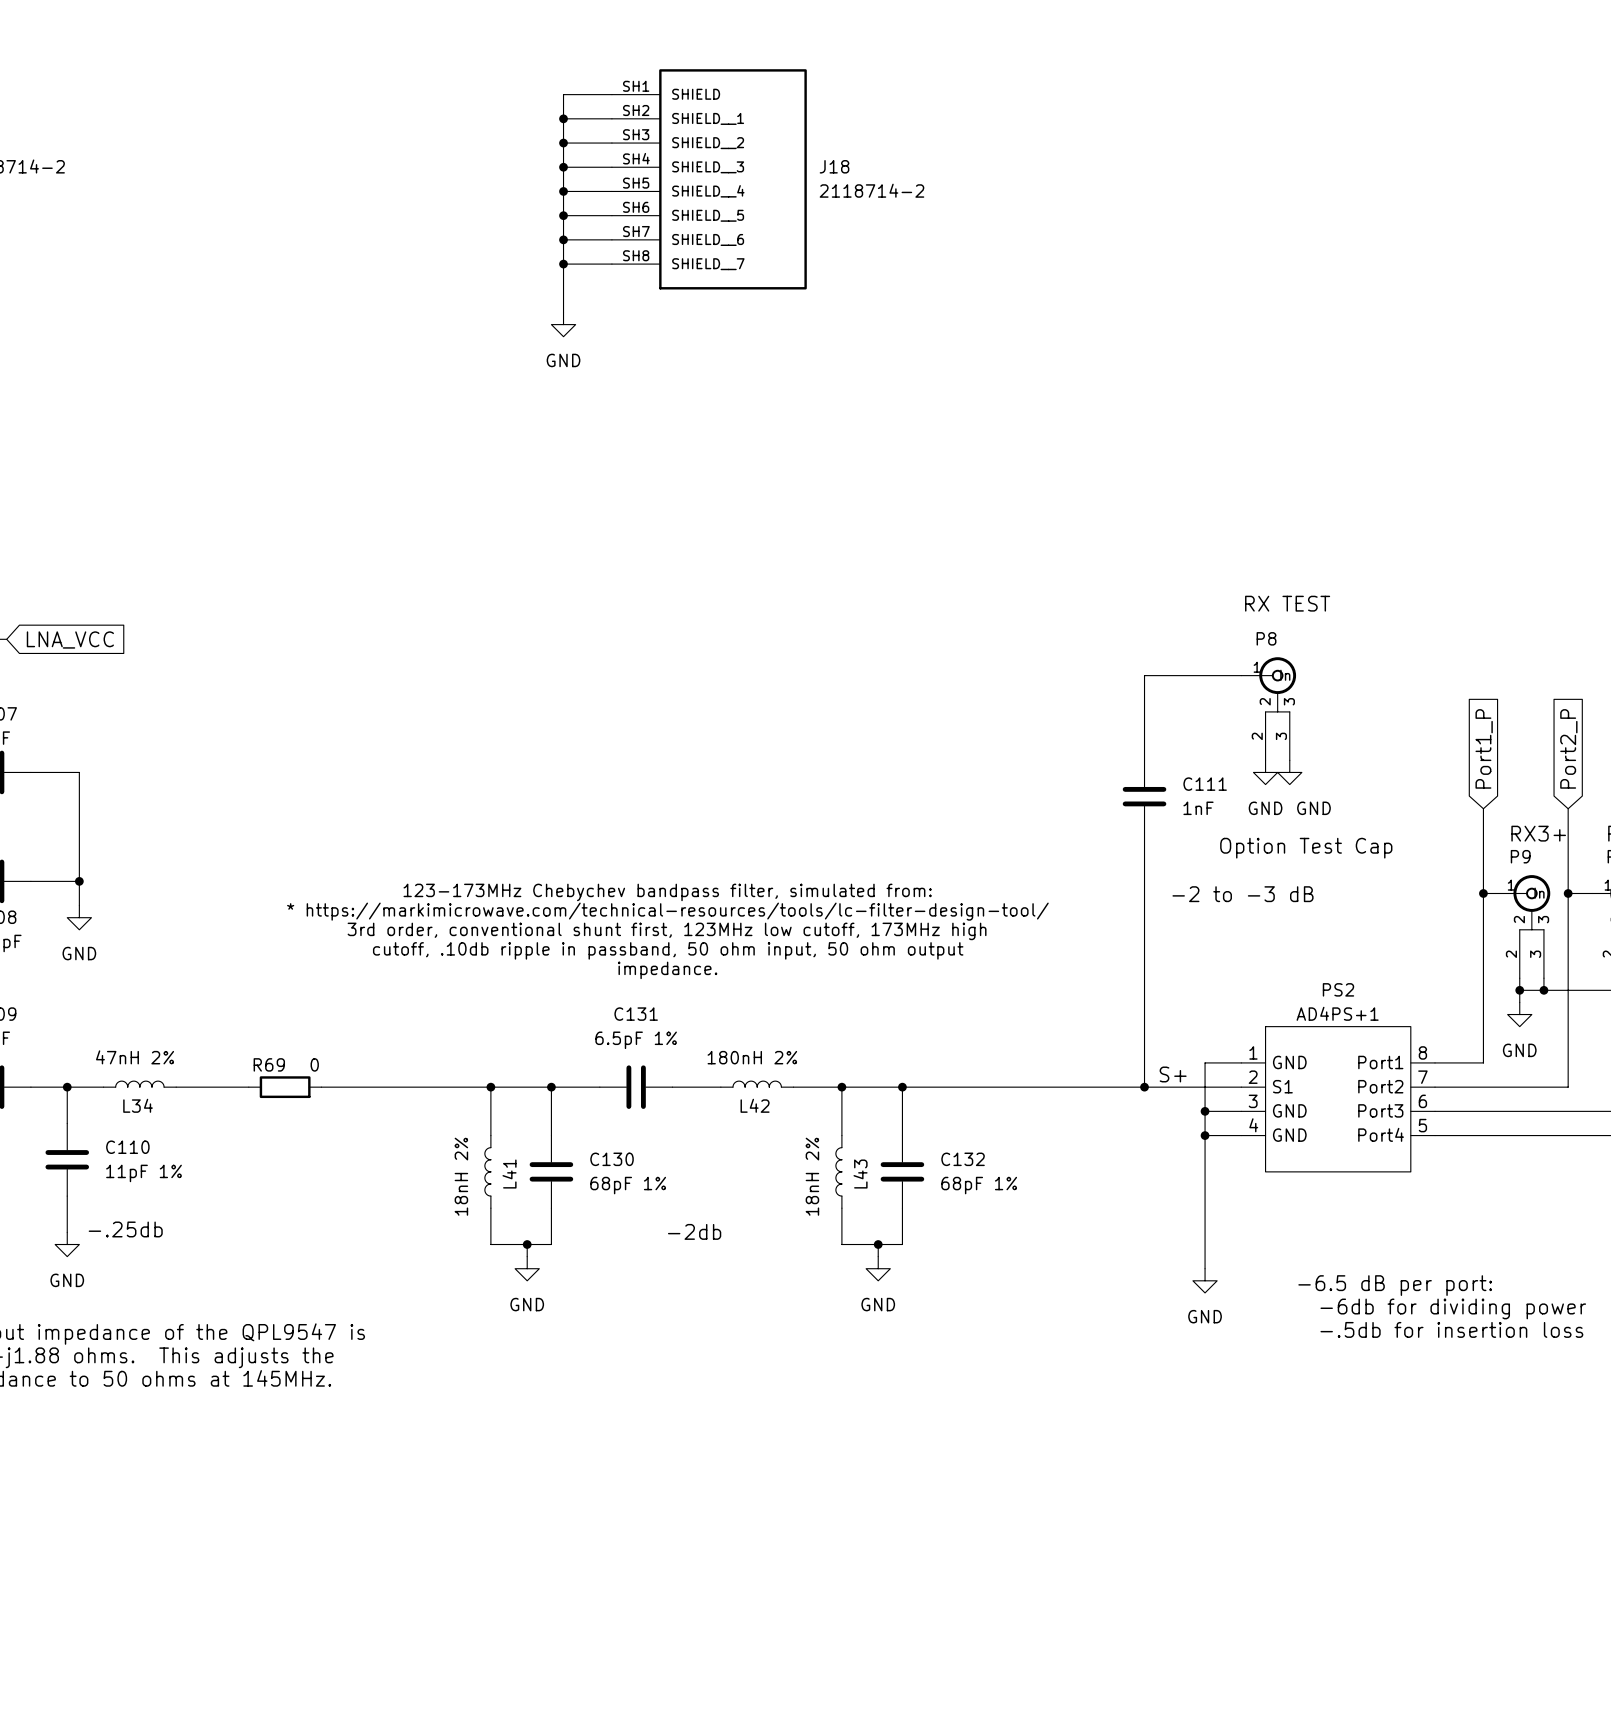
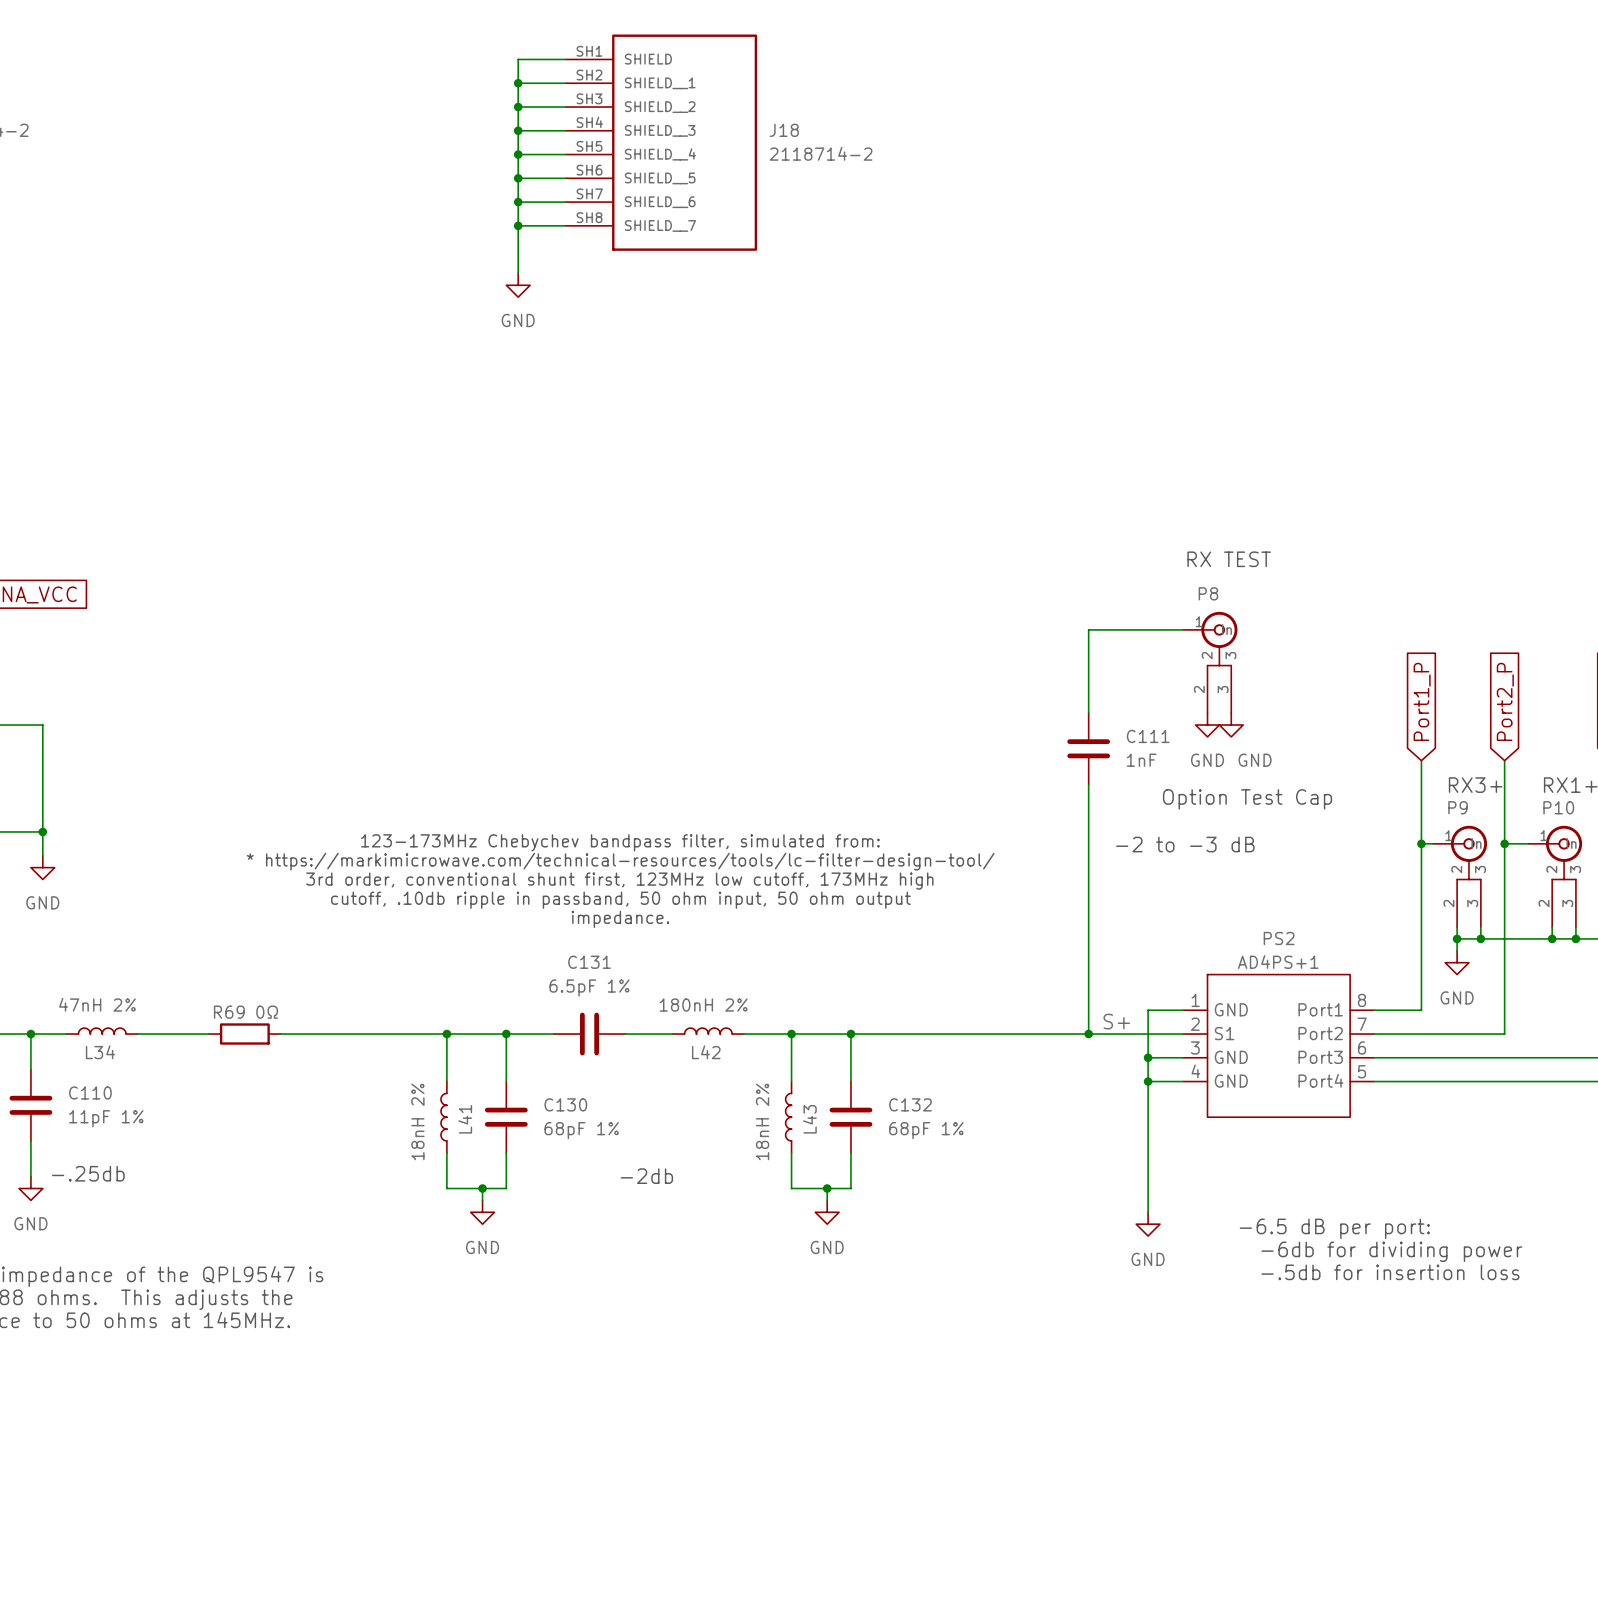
R69 value: 0 (314, 1064) -> 0Ω (267, 1012)

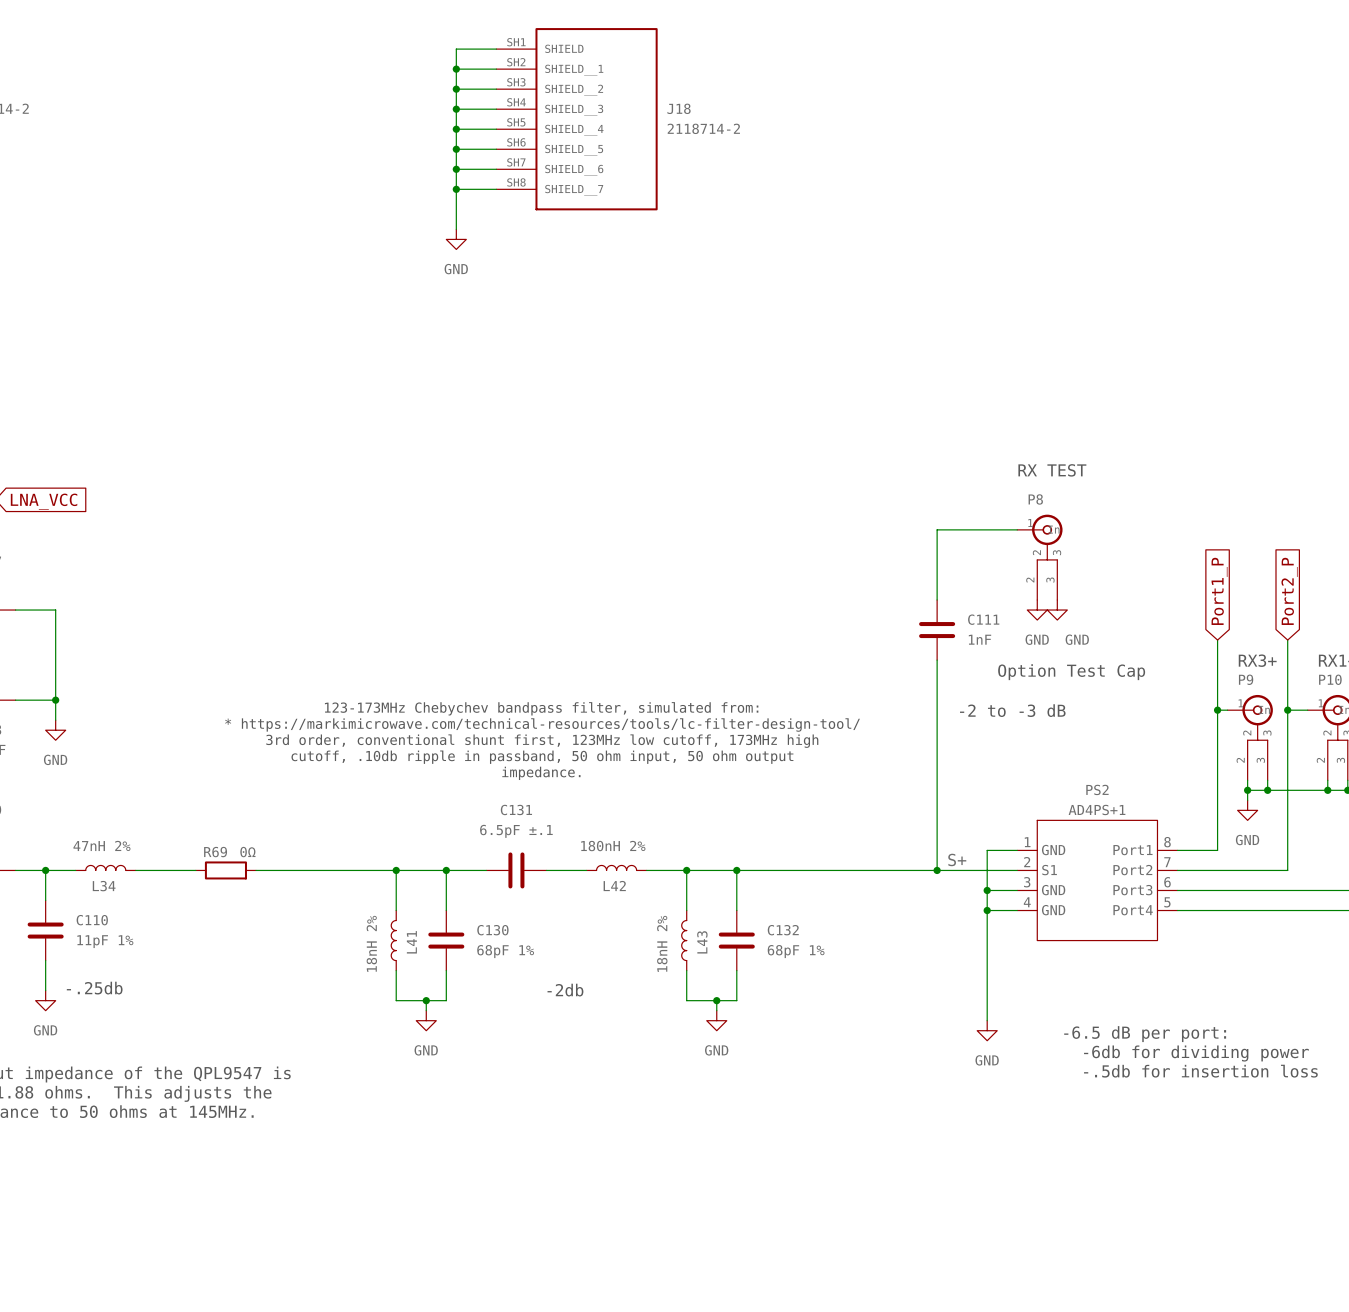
C131 value: 6.5pF 1% (589, 988) -> 6.5pF ±.1 (516, 831)

